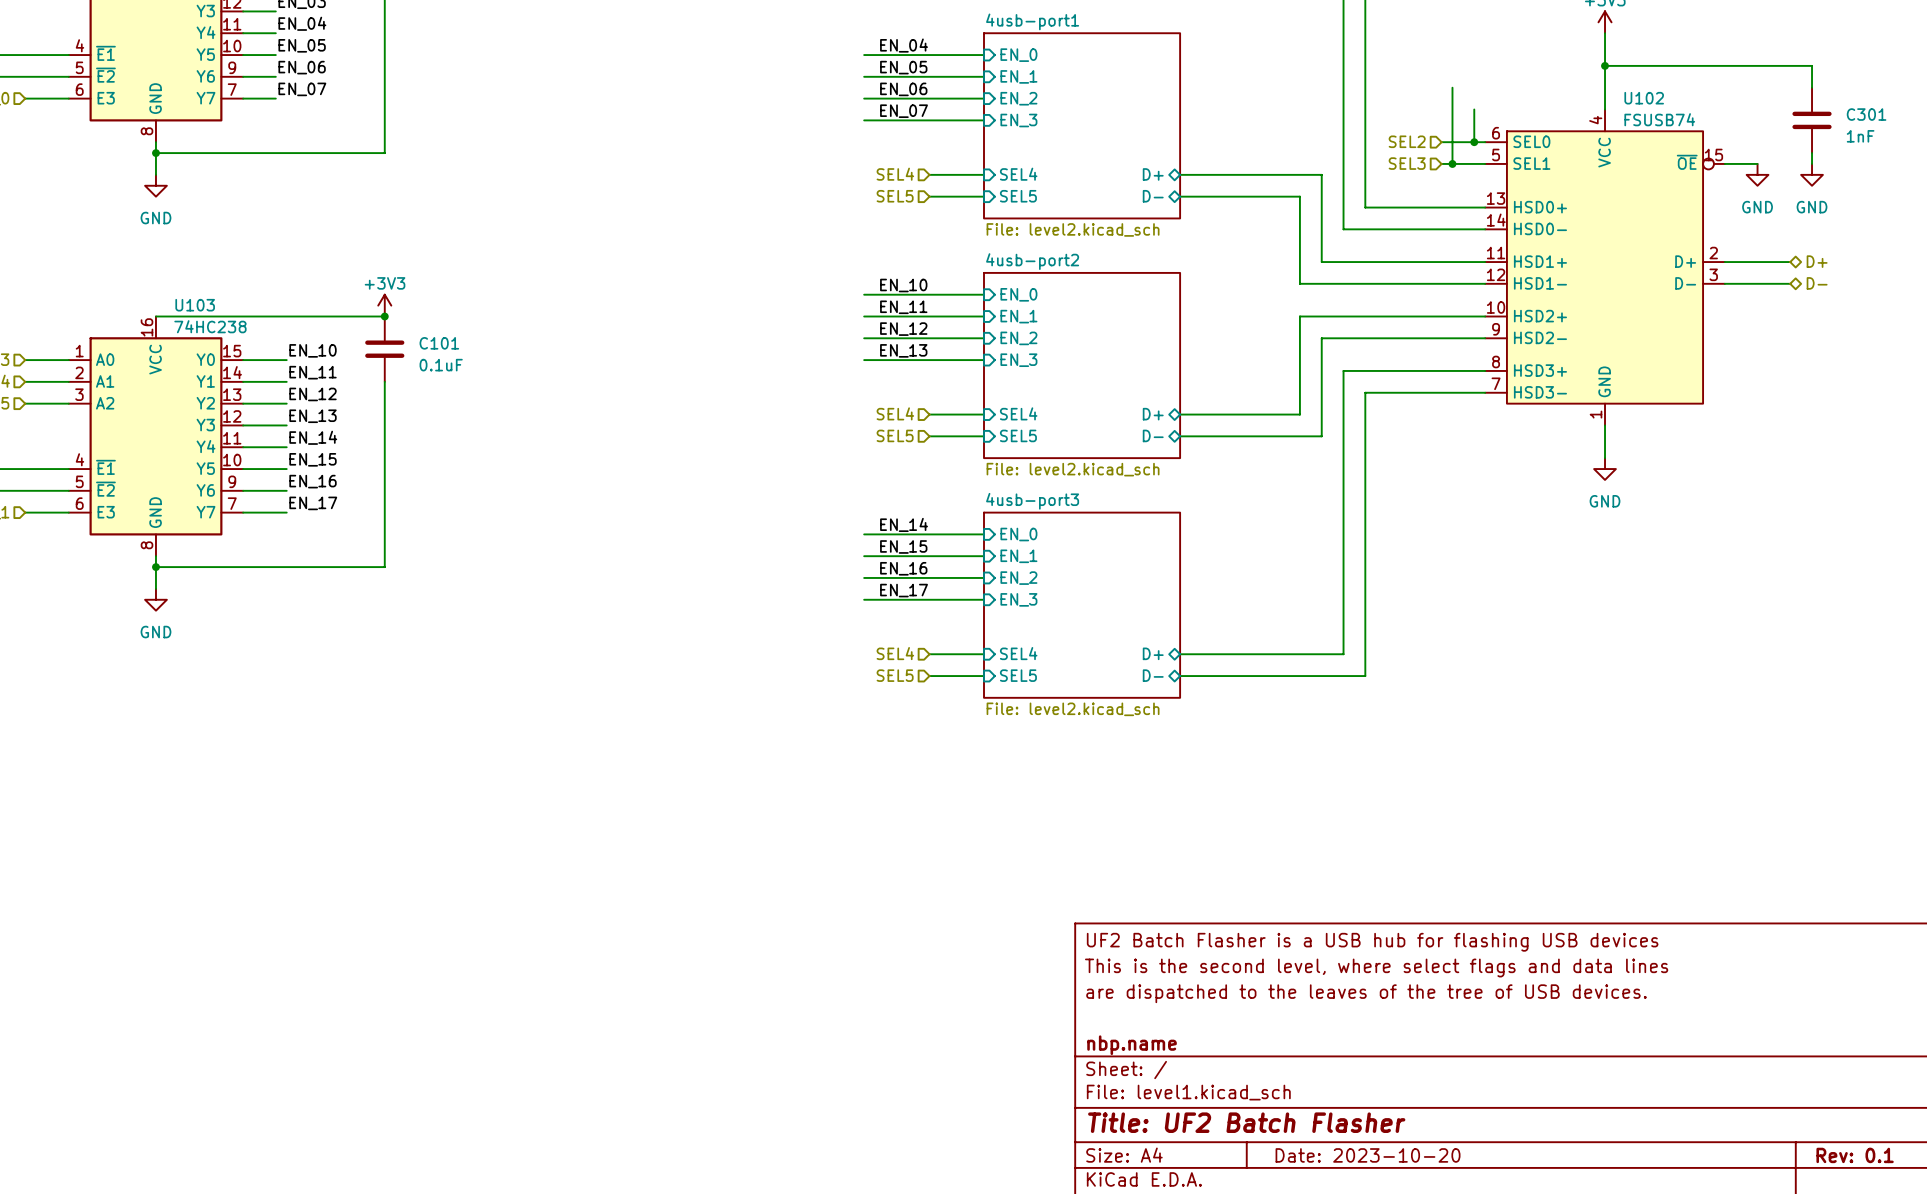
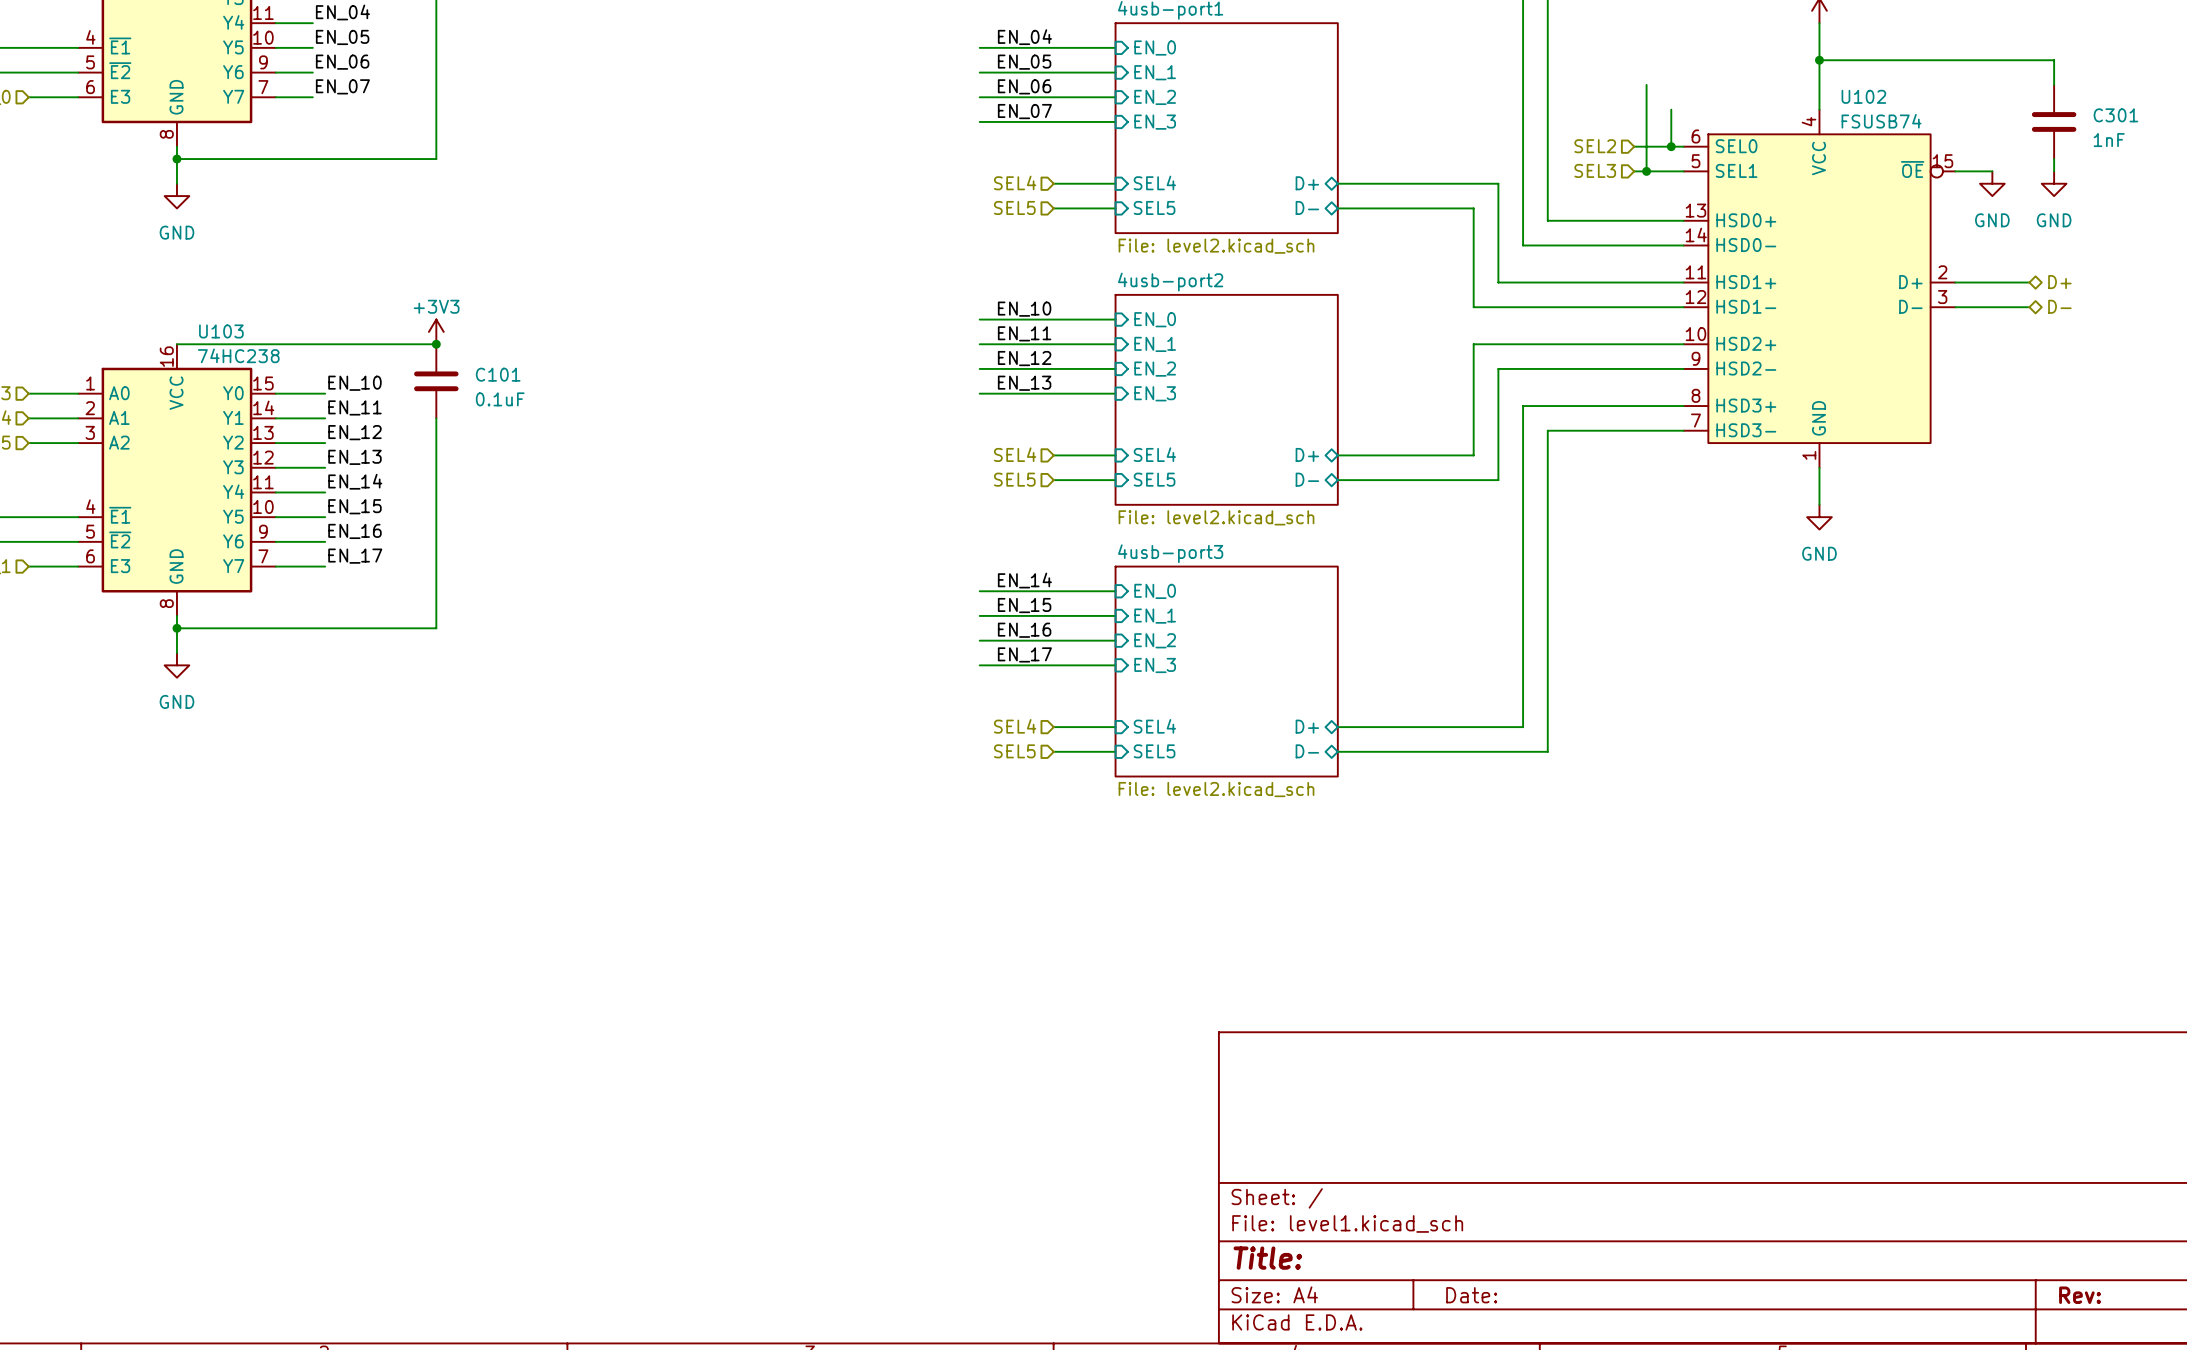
title block: UF2 Batch Flasher is a USB hub for flashing USB devices (1372, 942) -> none
title block: This is the second level, where select flags and data lines (1376, 968) -> none
title block: are dispatched to the leaves of the tree of USB devices. (1366, 993) -> none
title block: nbp.name (1132, 1045) -> none
title block: Title: UF2 Batch Flasher (1246, 1122) -> Title: (1267, 1258)
title block: Date: 2023-10-20 (1368, 1155) -> Date: (1471, 1295)
title block: Rev: 0.1 (1855, 1155) -> Rev: (2080, 1295)

